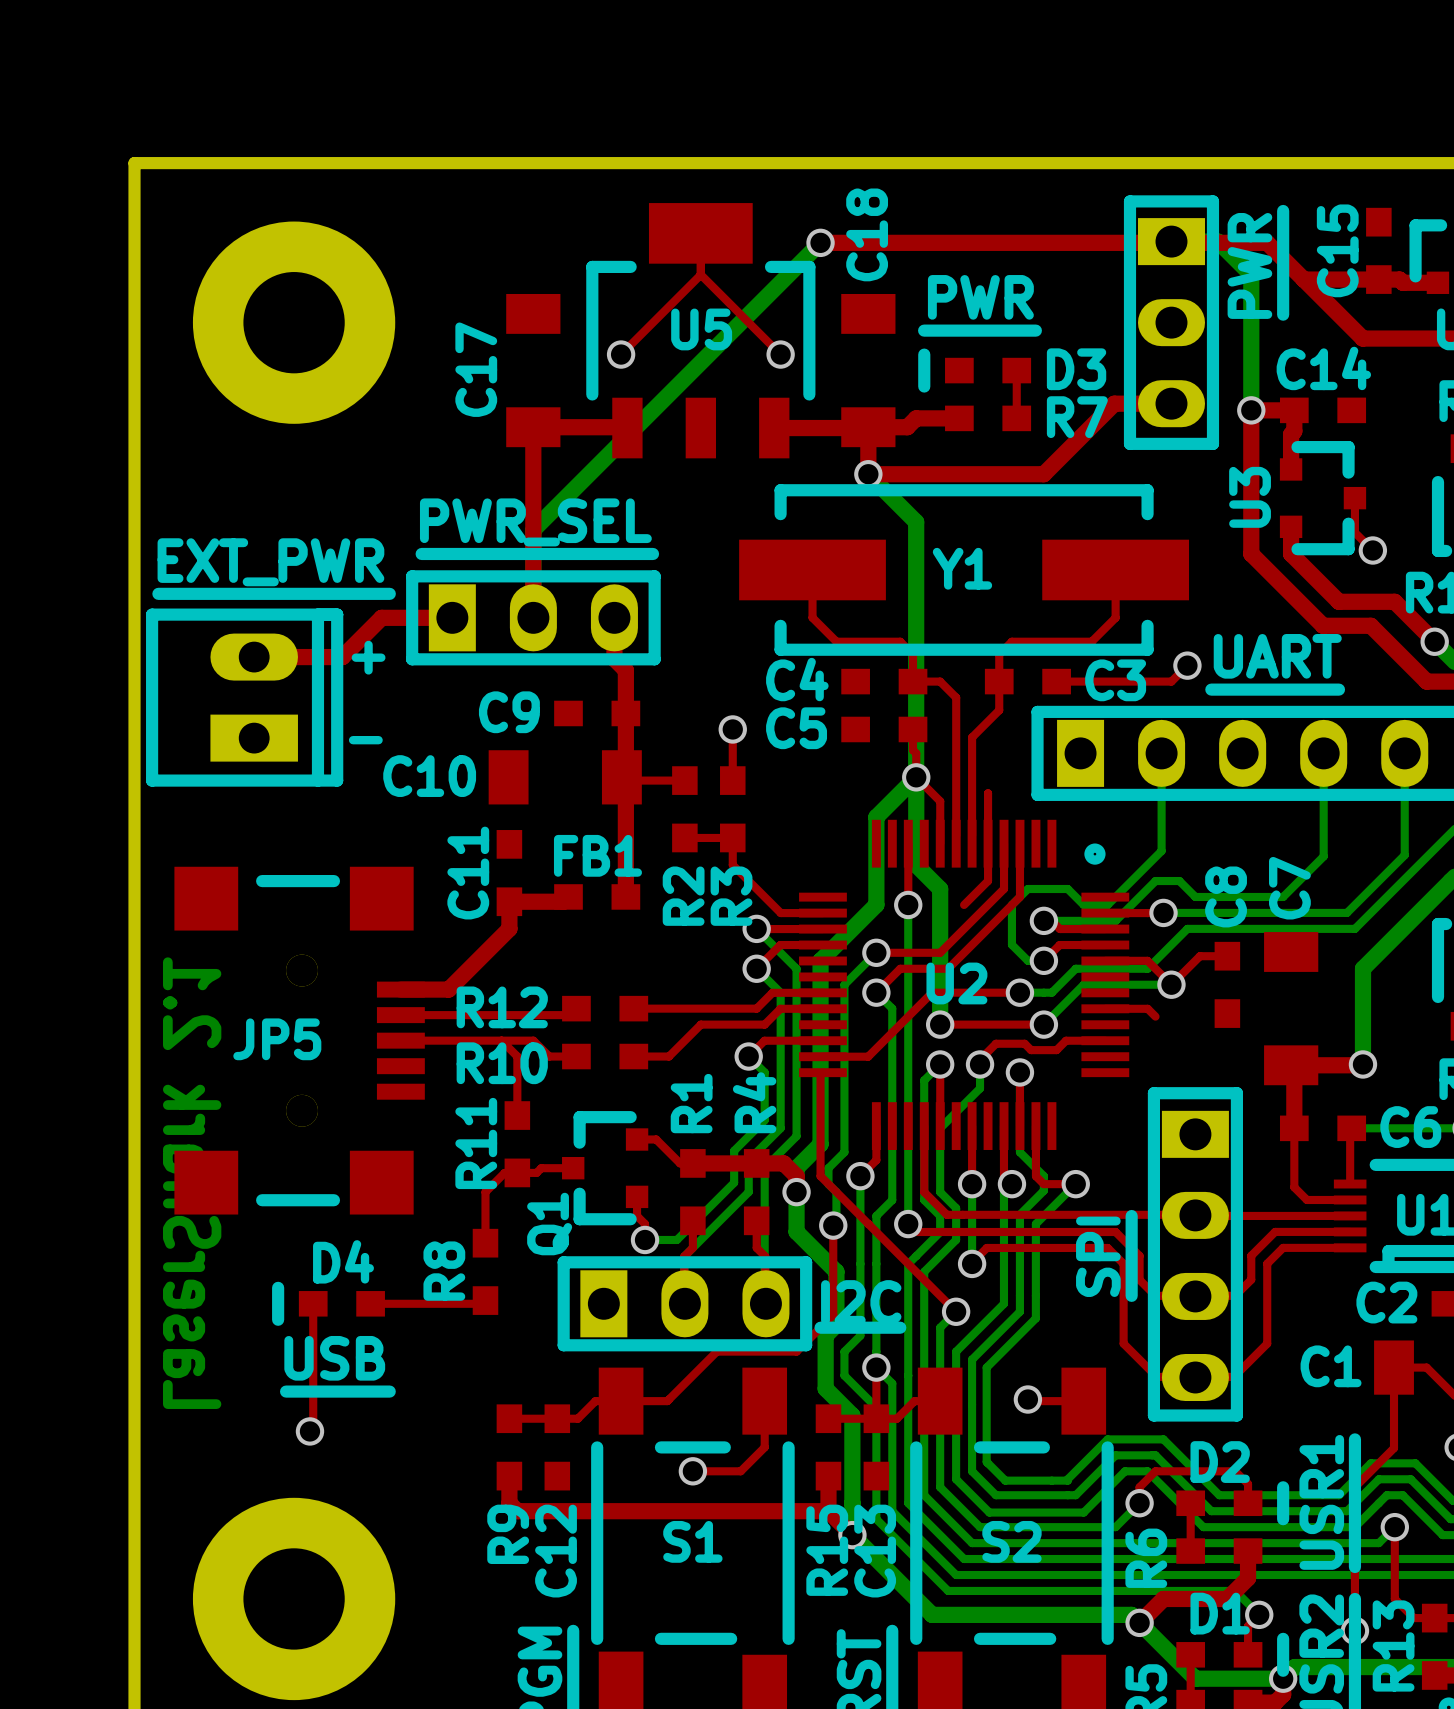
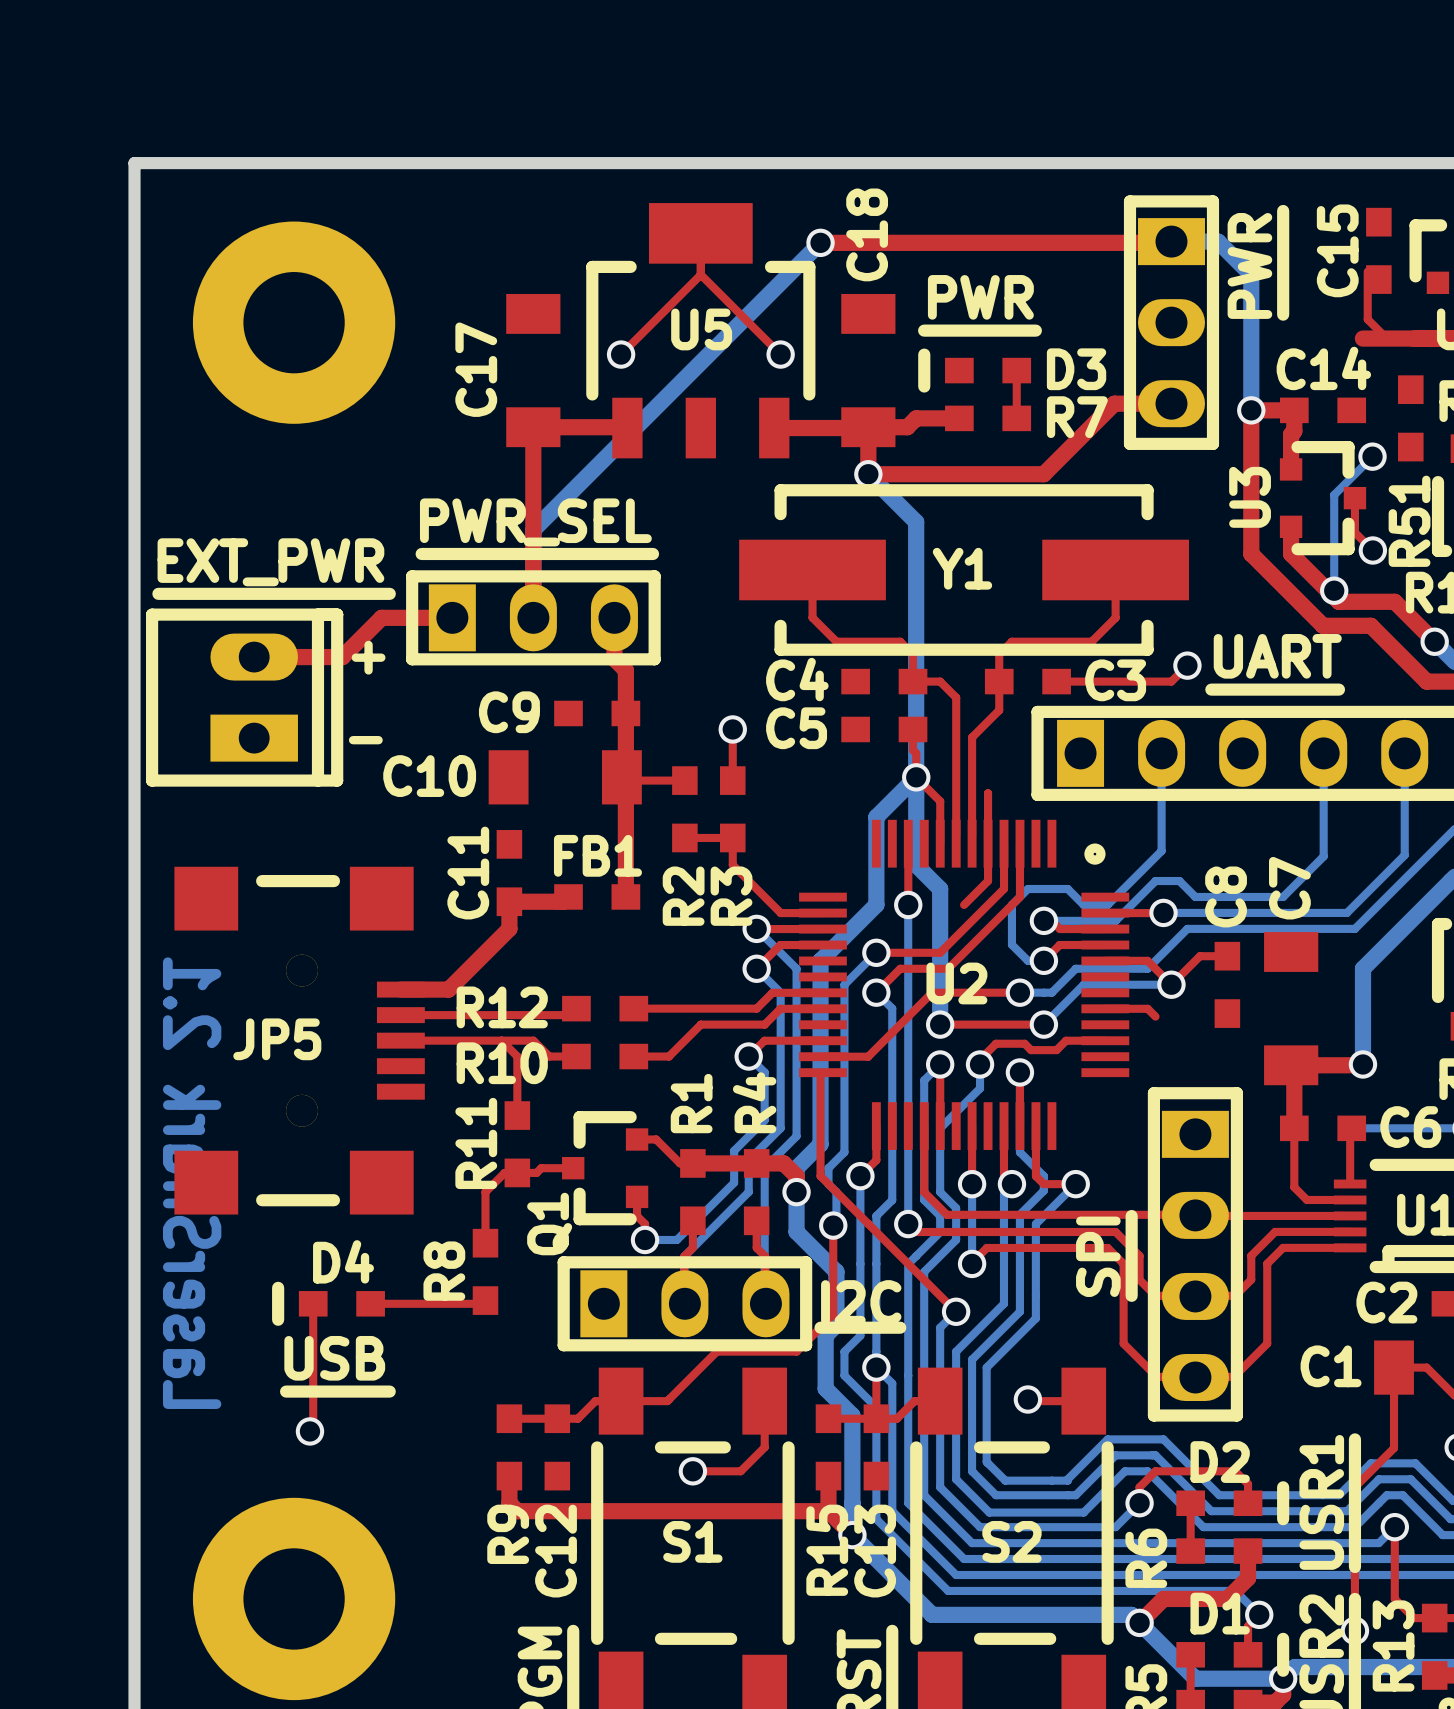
top track: (1172, 242) (1267, 242) (1362, 338) -> none
top track: none -> (1367, 271) (1367, 319) (1386, 338)
top track: (1303, 279) (1399, 279) (1402, 282) (1437, 282) -> none
R51: none -> (1410, 418)
bottom track: none -> (1372, 456) (1334, 494) (1334, 590)
via: none -> (1372, 456)
via: none -> (1334, 590)

